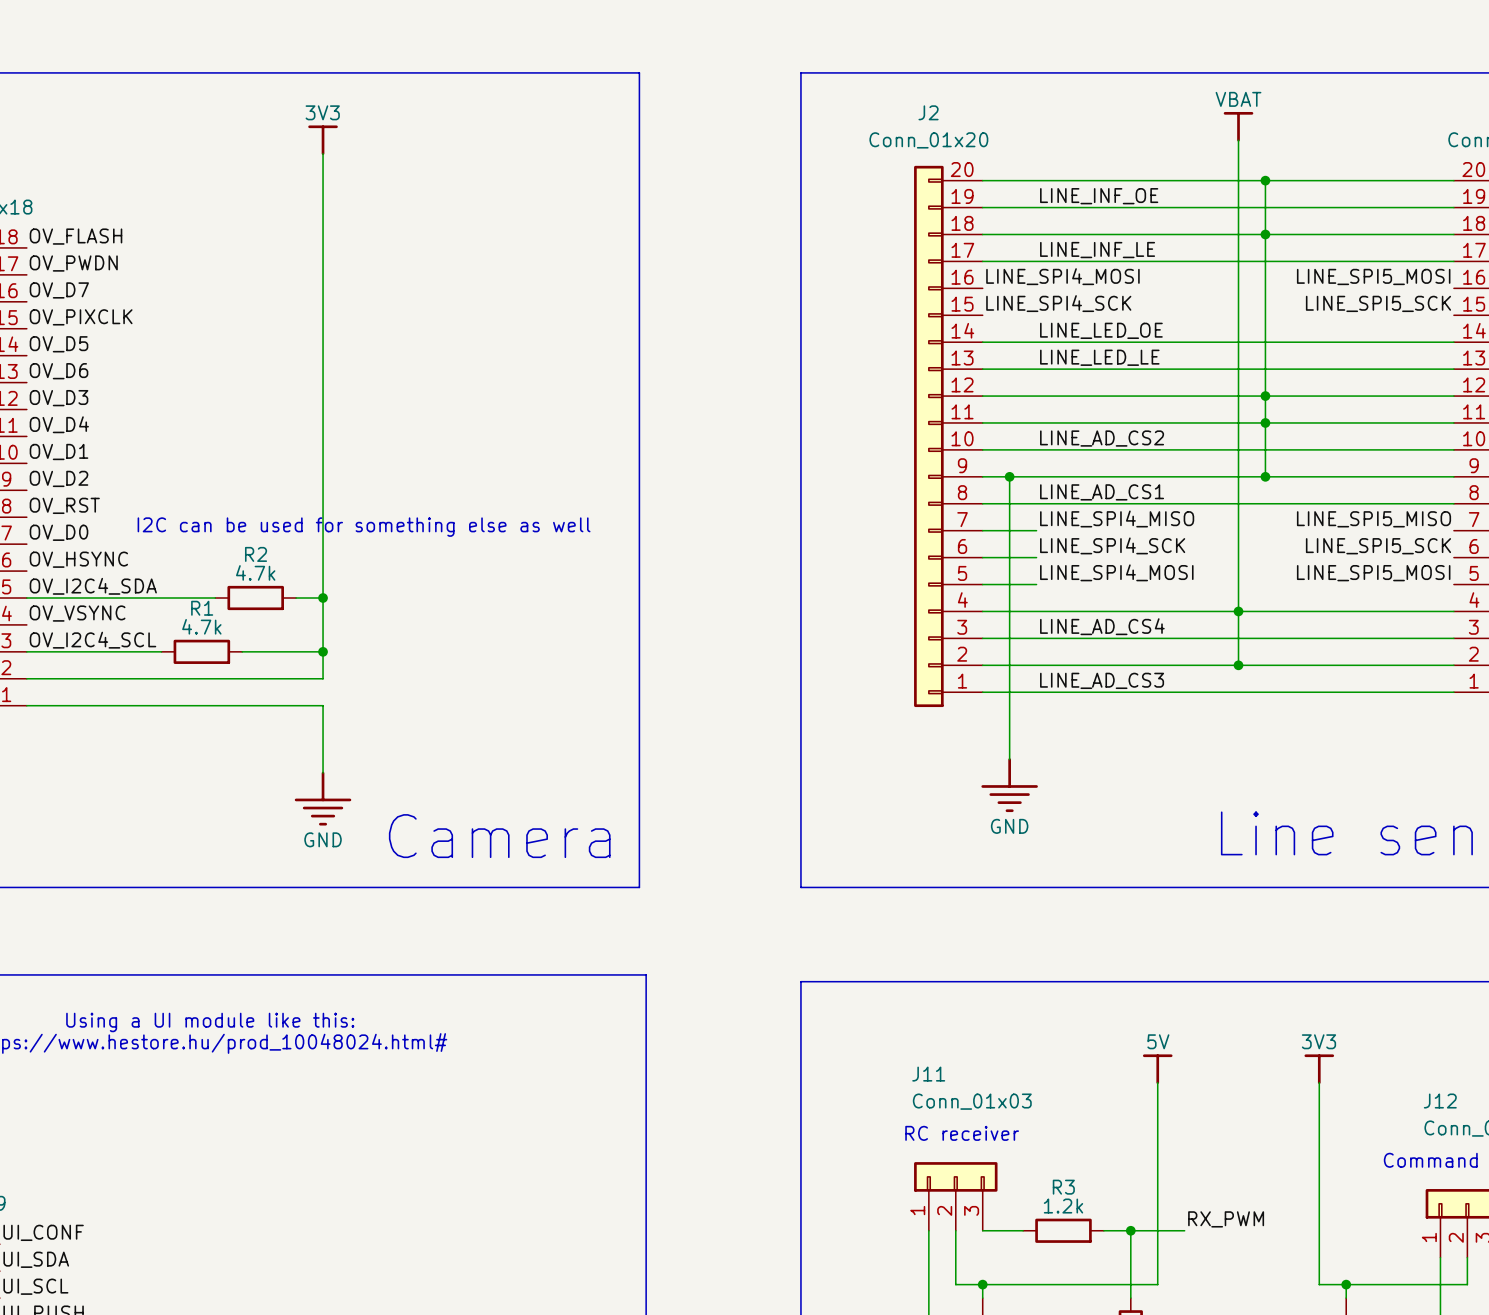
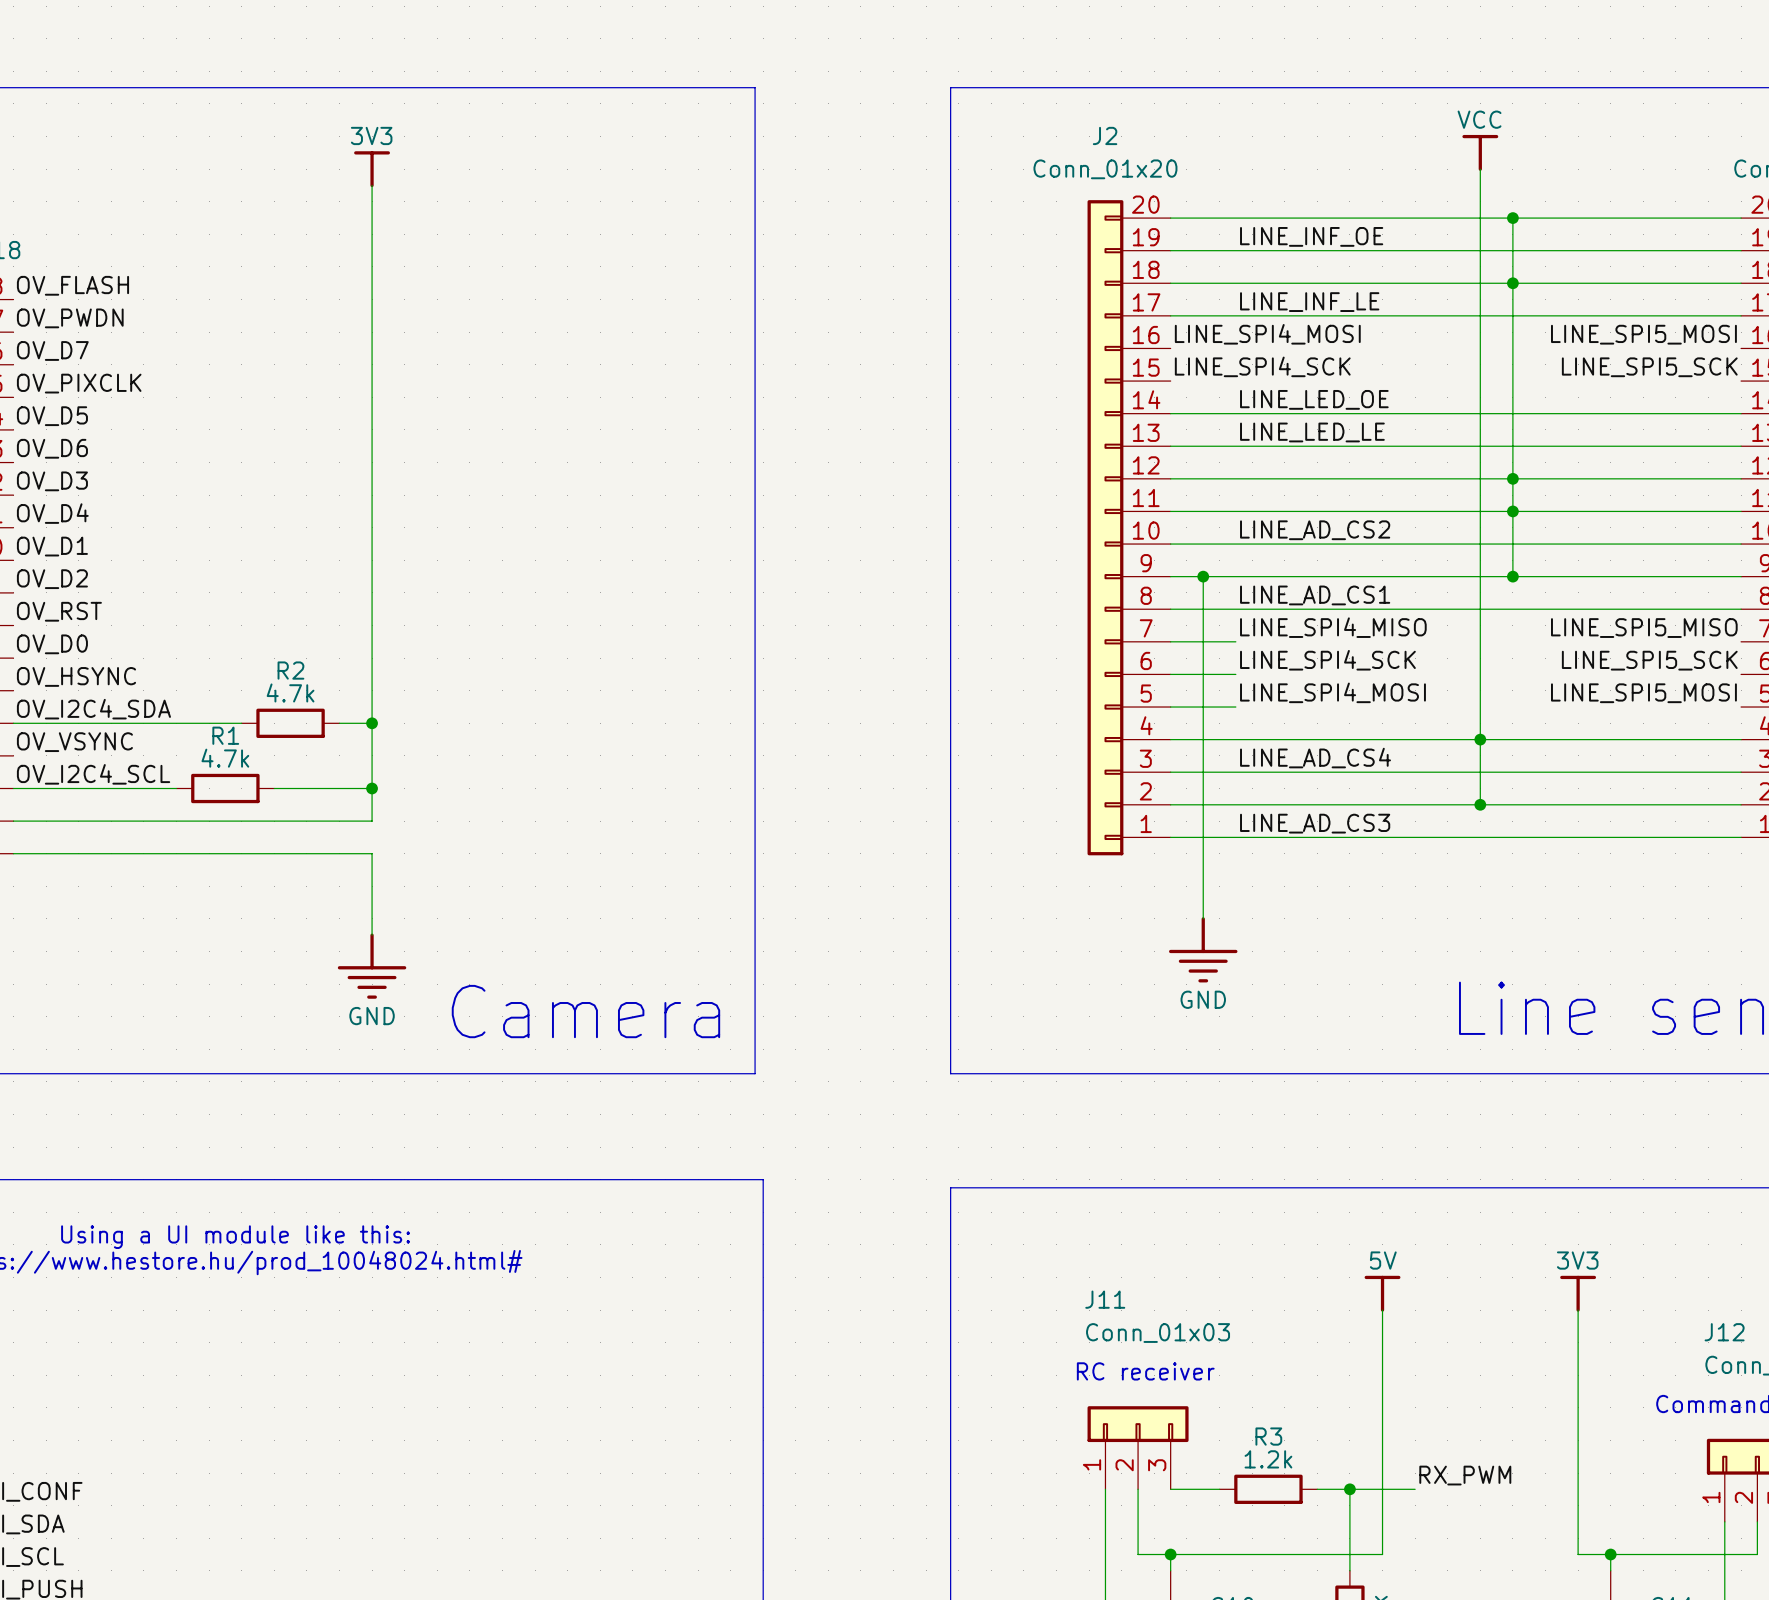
power symbol: VBAT (1238, 126) -> VCC (1480, 152)
text: I2C can be used for something else as well (364, 527) -> none

